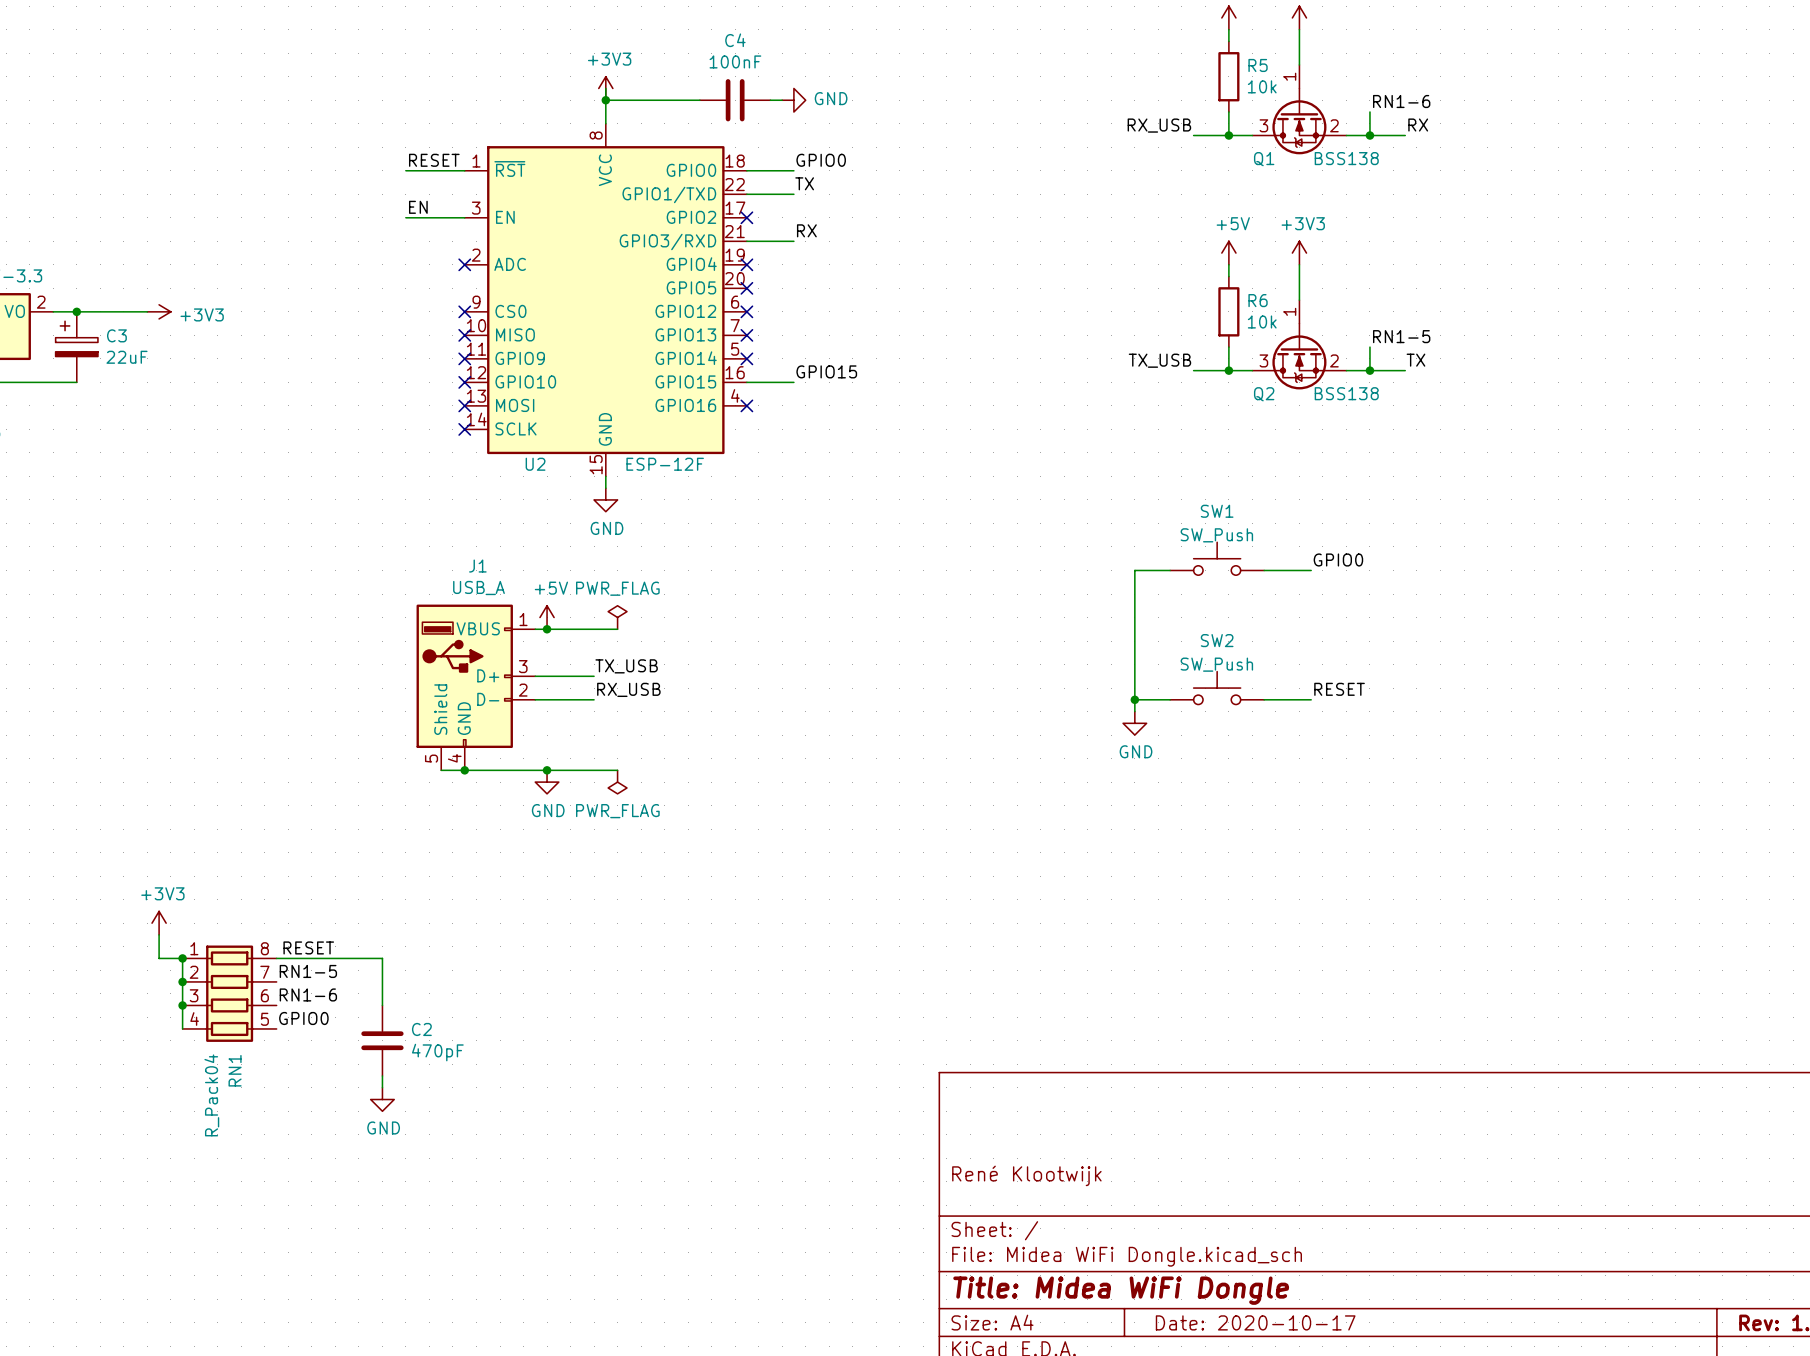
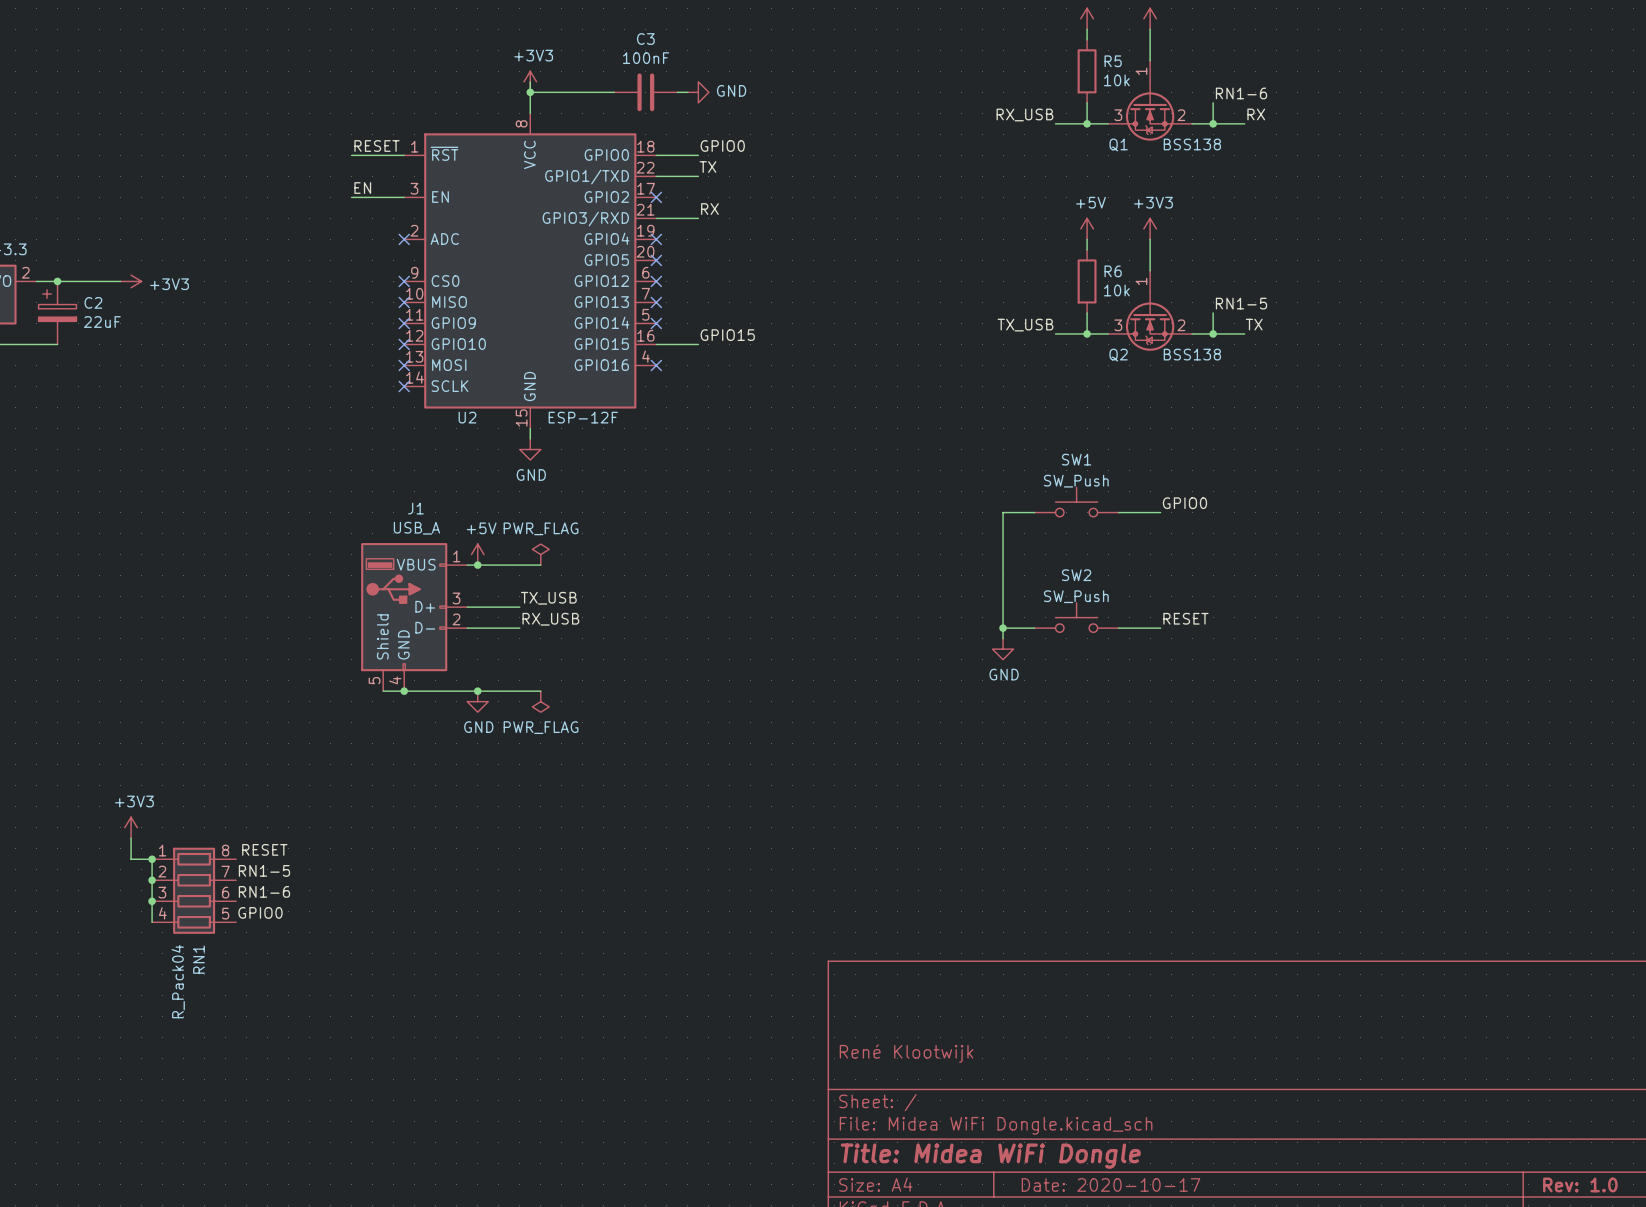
C4 name: C4 (735, 40) -> C3 (645, 39)
C3 name: C3 (116, 335) -> C2 (93, 302)
wire: (276, 958) (382, 958) (382, 1005) -> none
C2: 470pF (382, 1040) -> none
wire: (382, 1076) (382, 1087) -> none
power symbol: GND (382, 1099) -> none

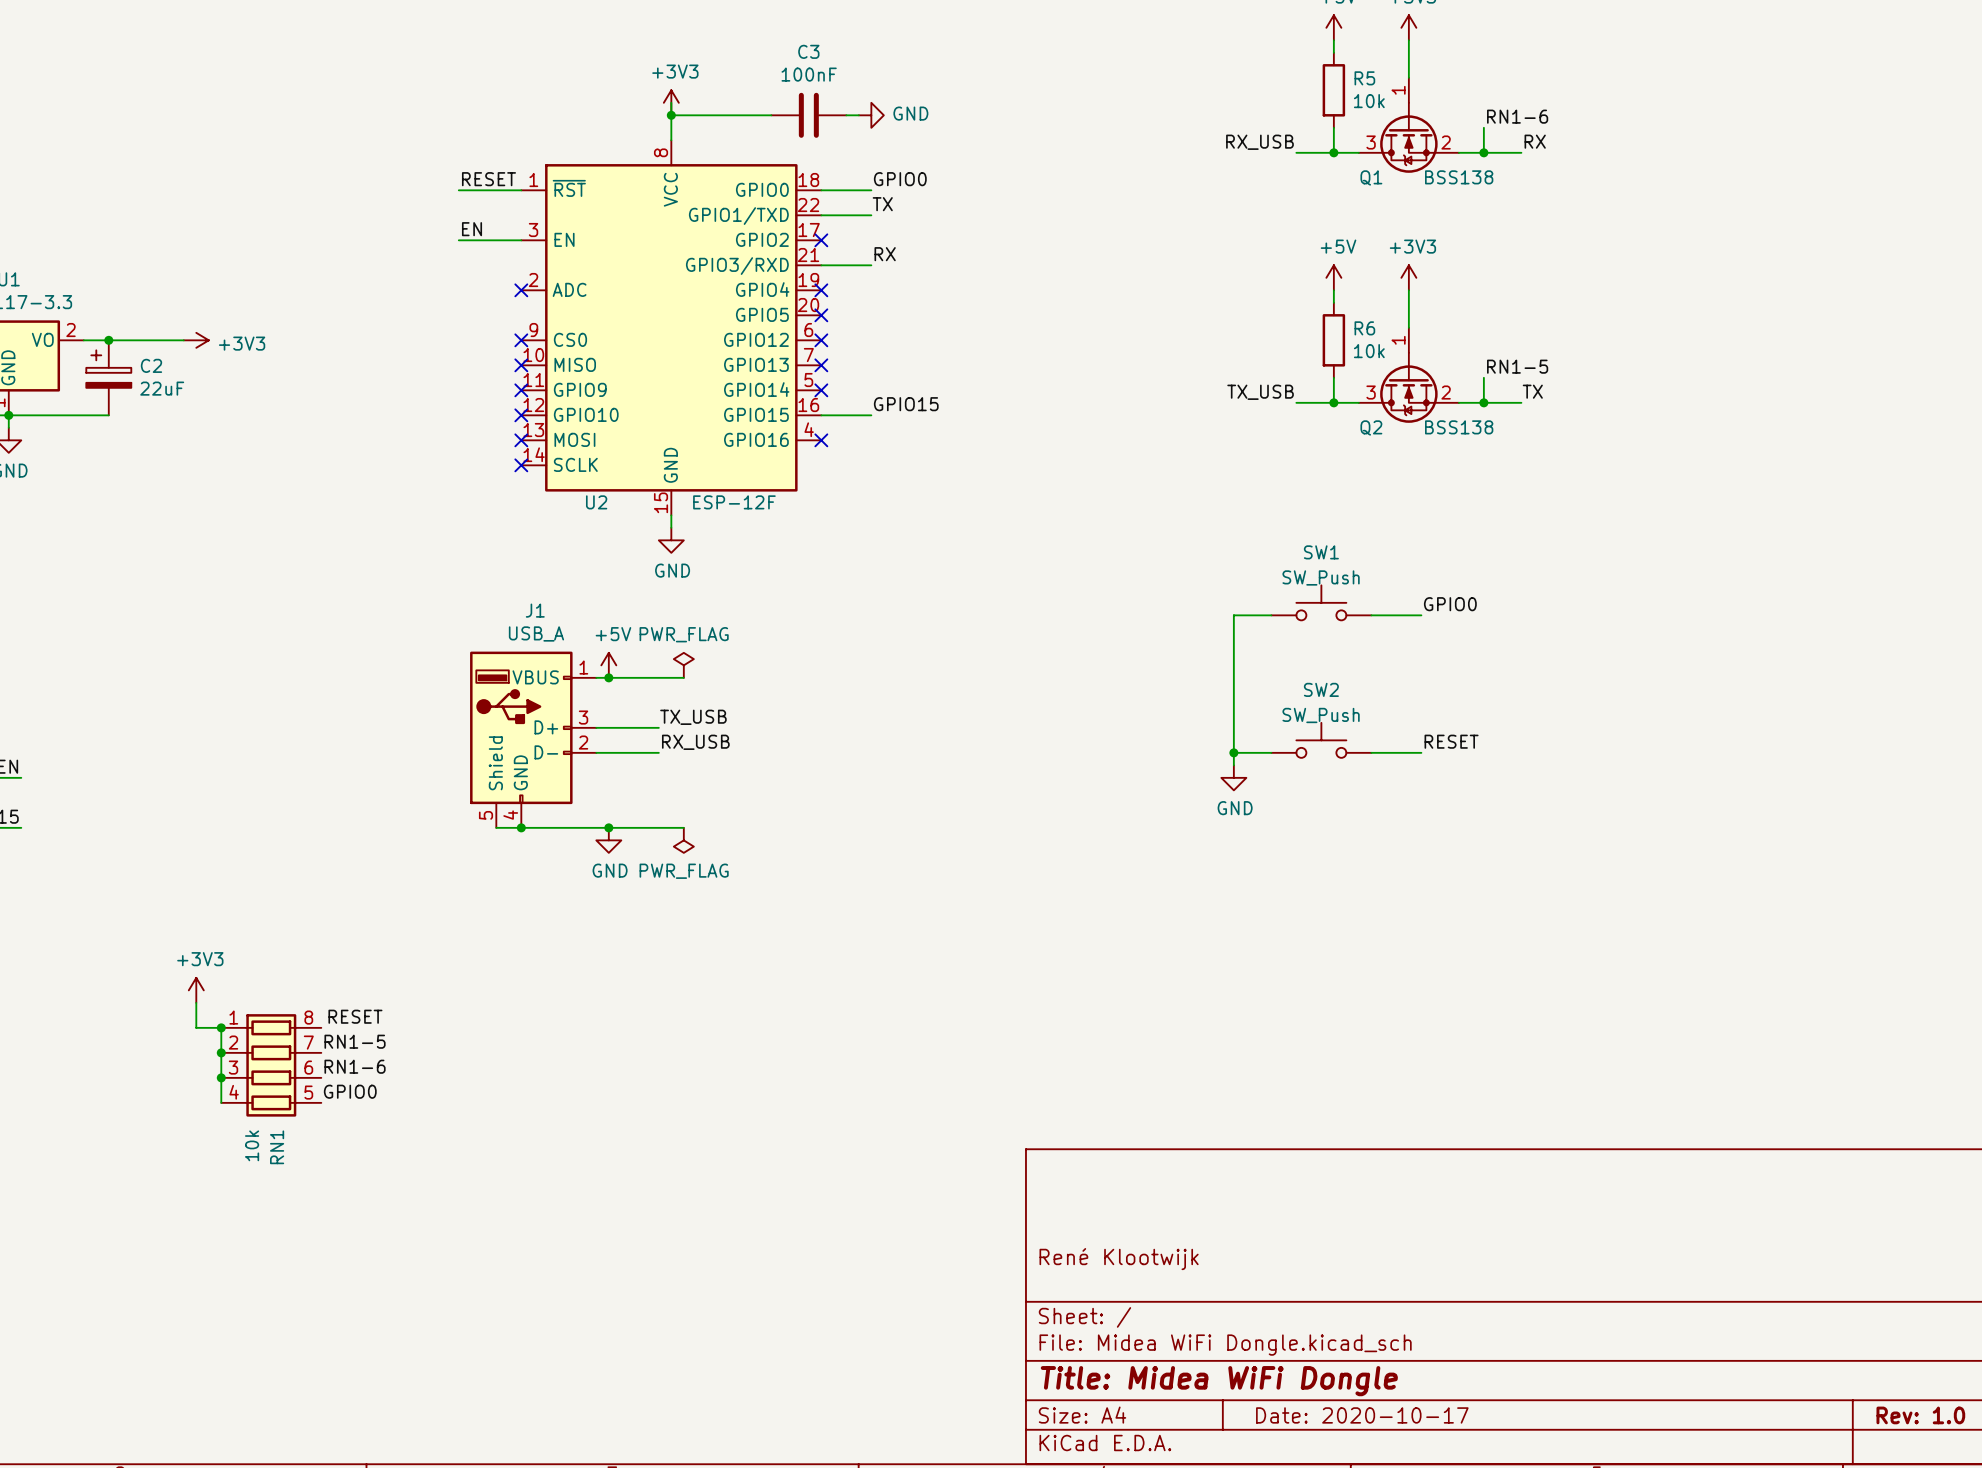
RN1 value: R_Pack04 (178, 981) -> 10k (252, 1145)

